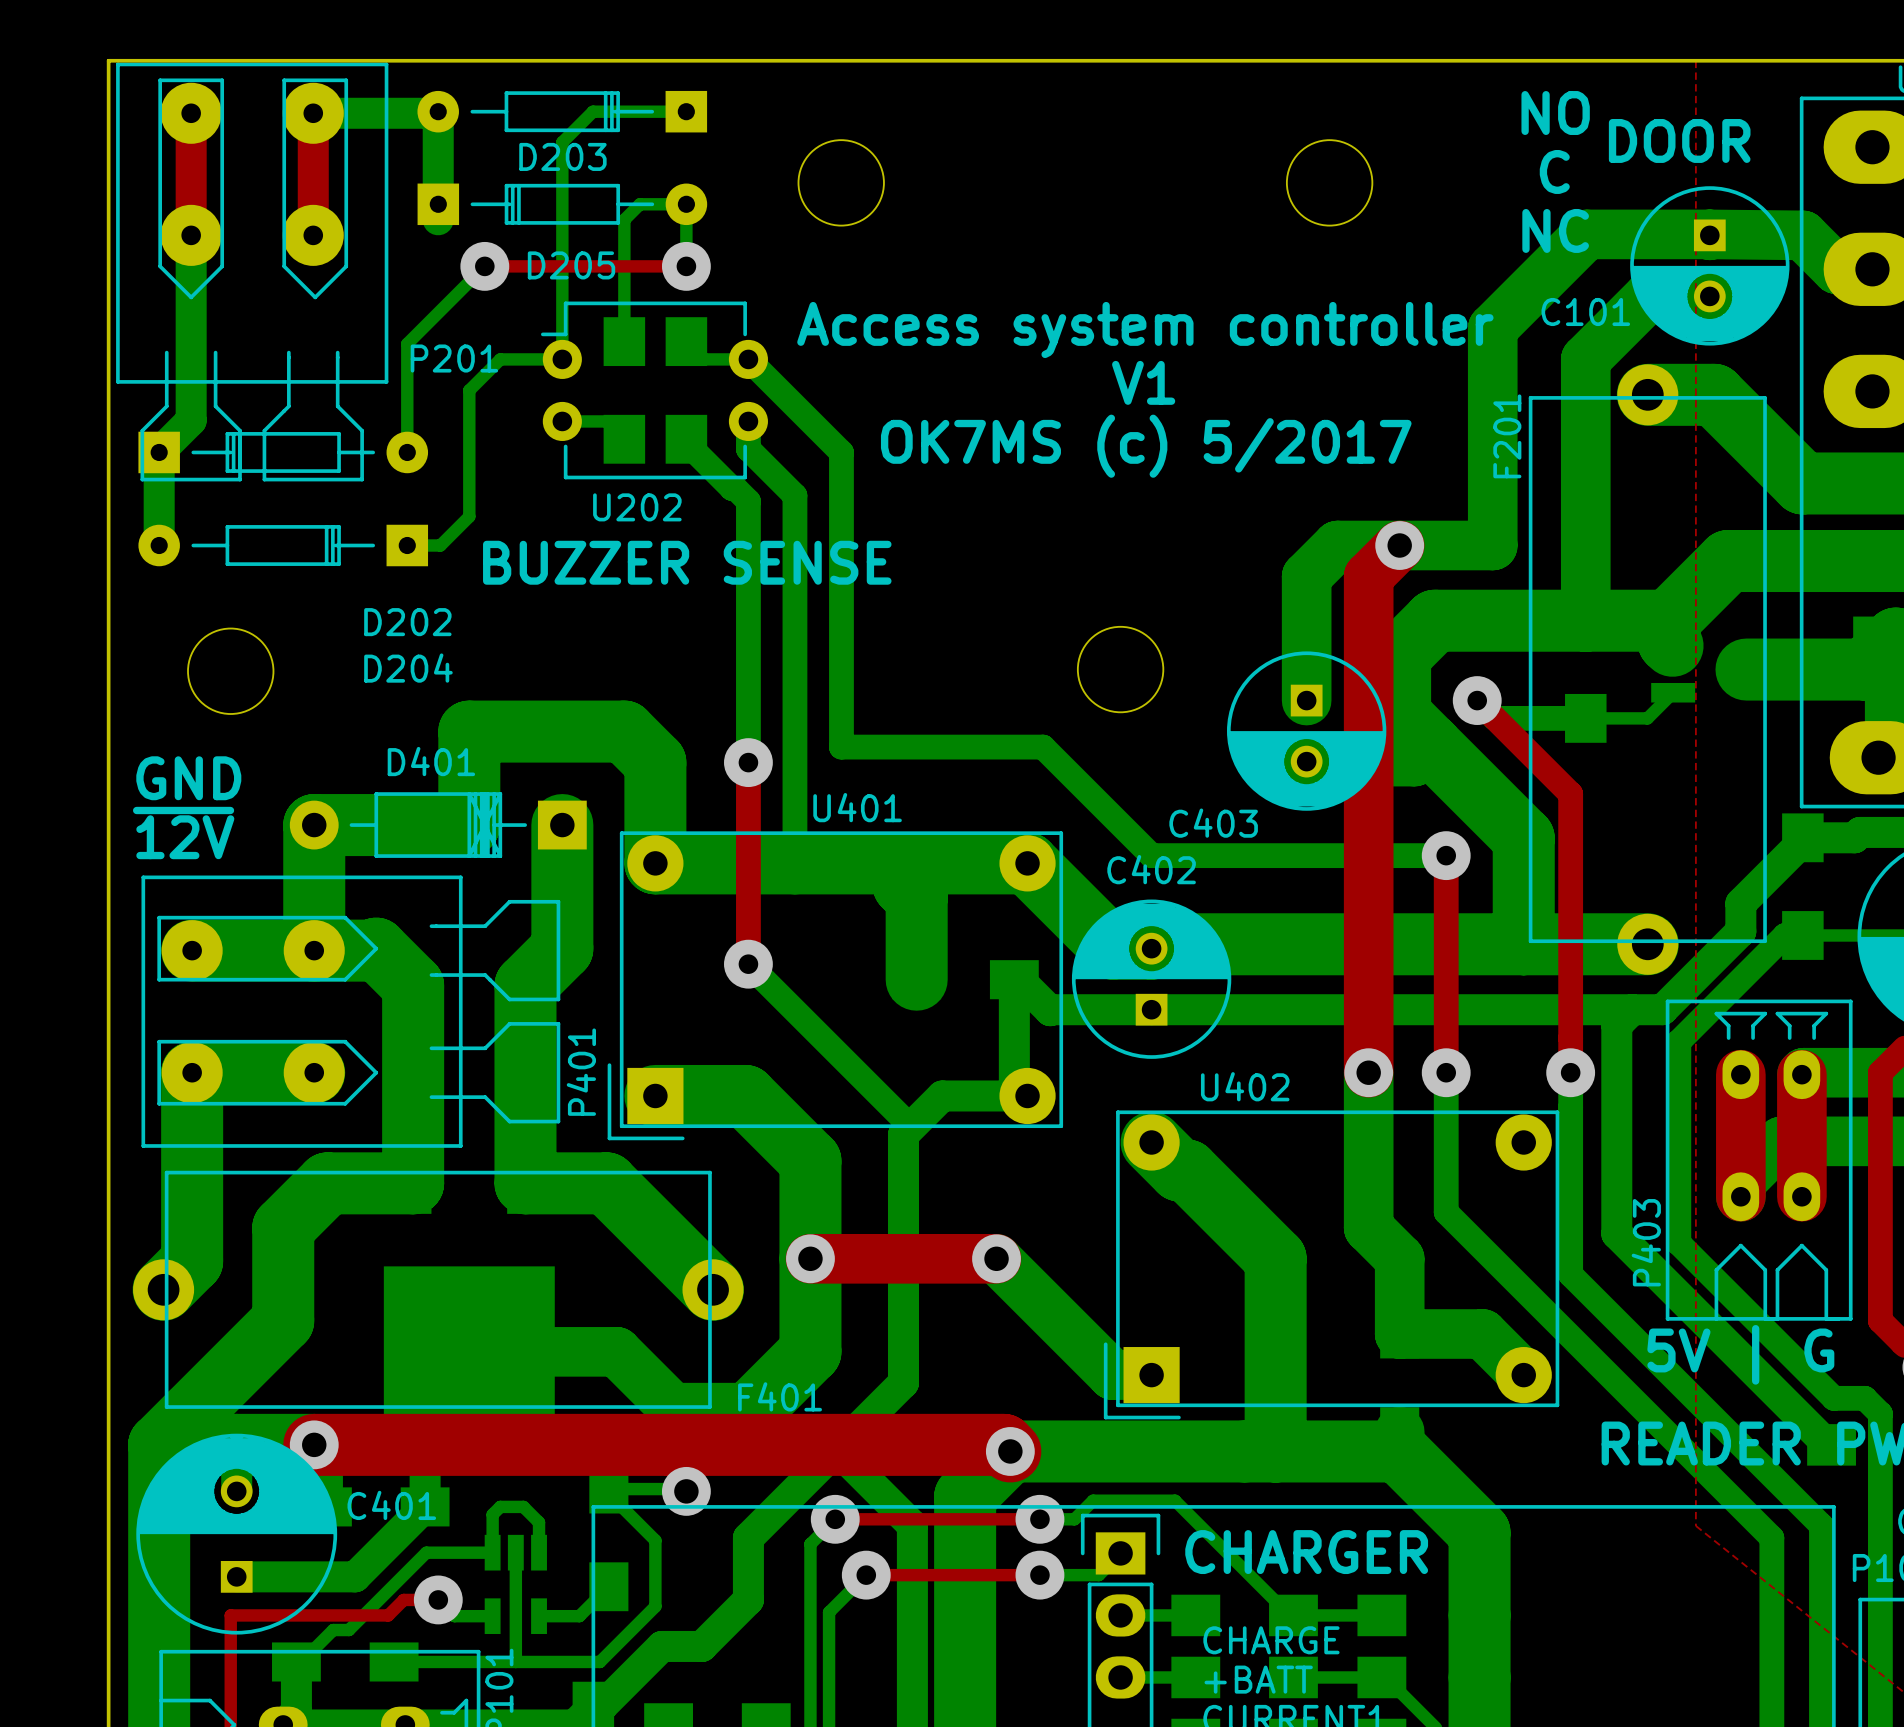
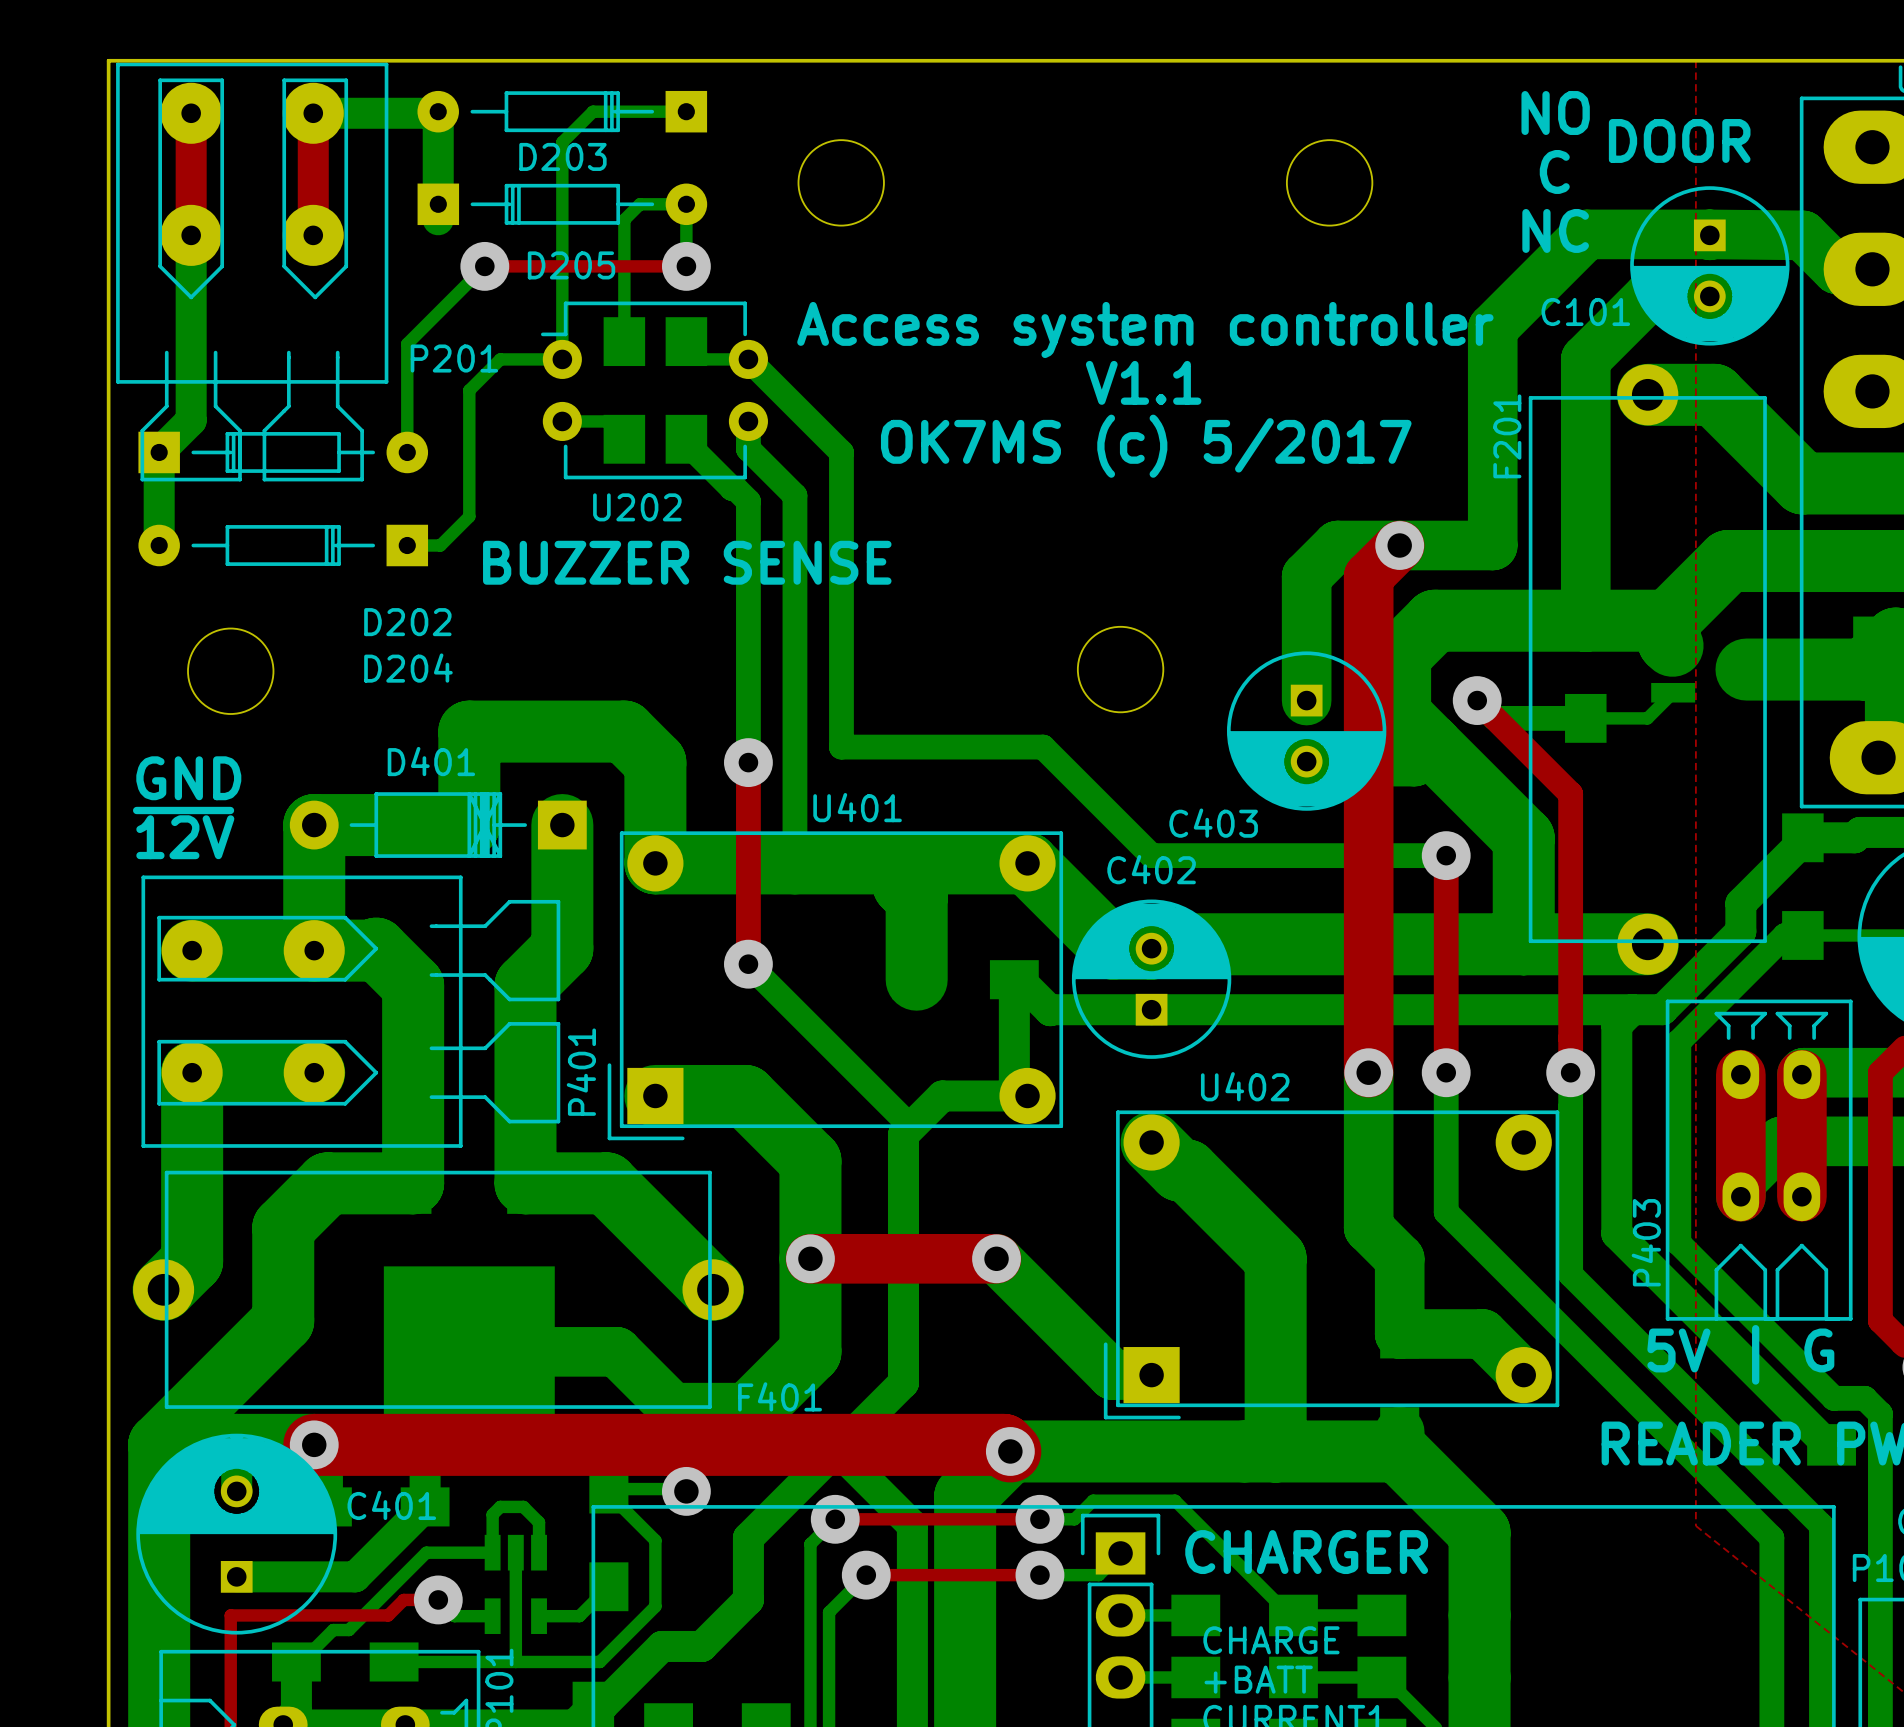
text: V1 (1143, 382) -> V1.1 (1143, 382)

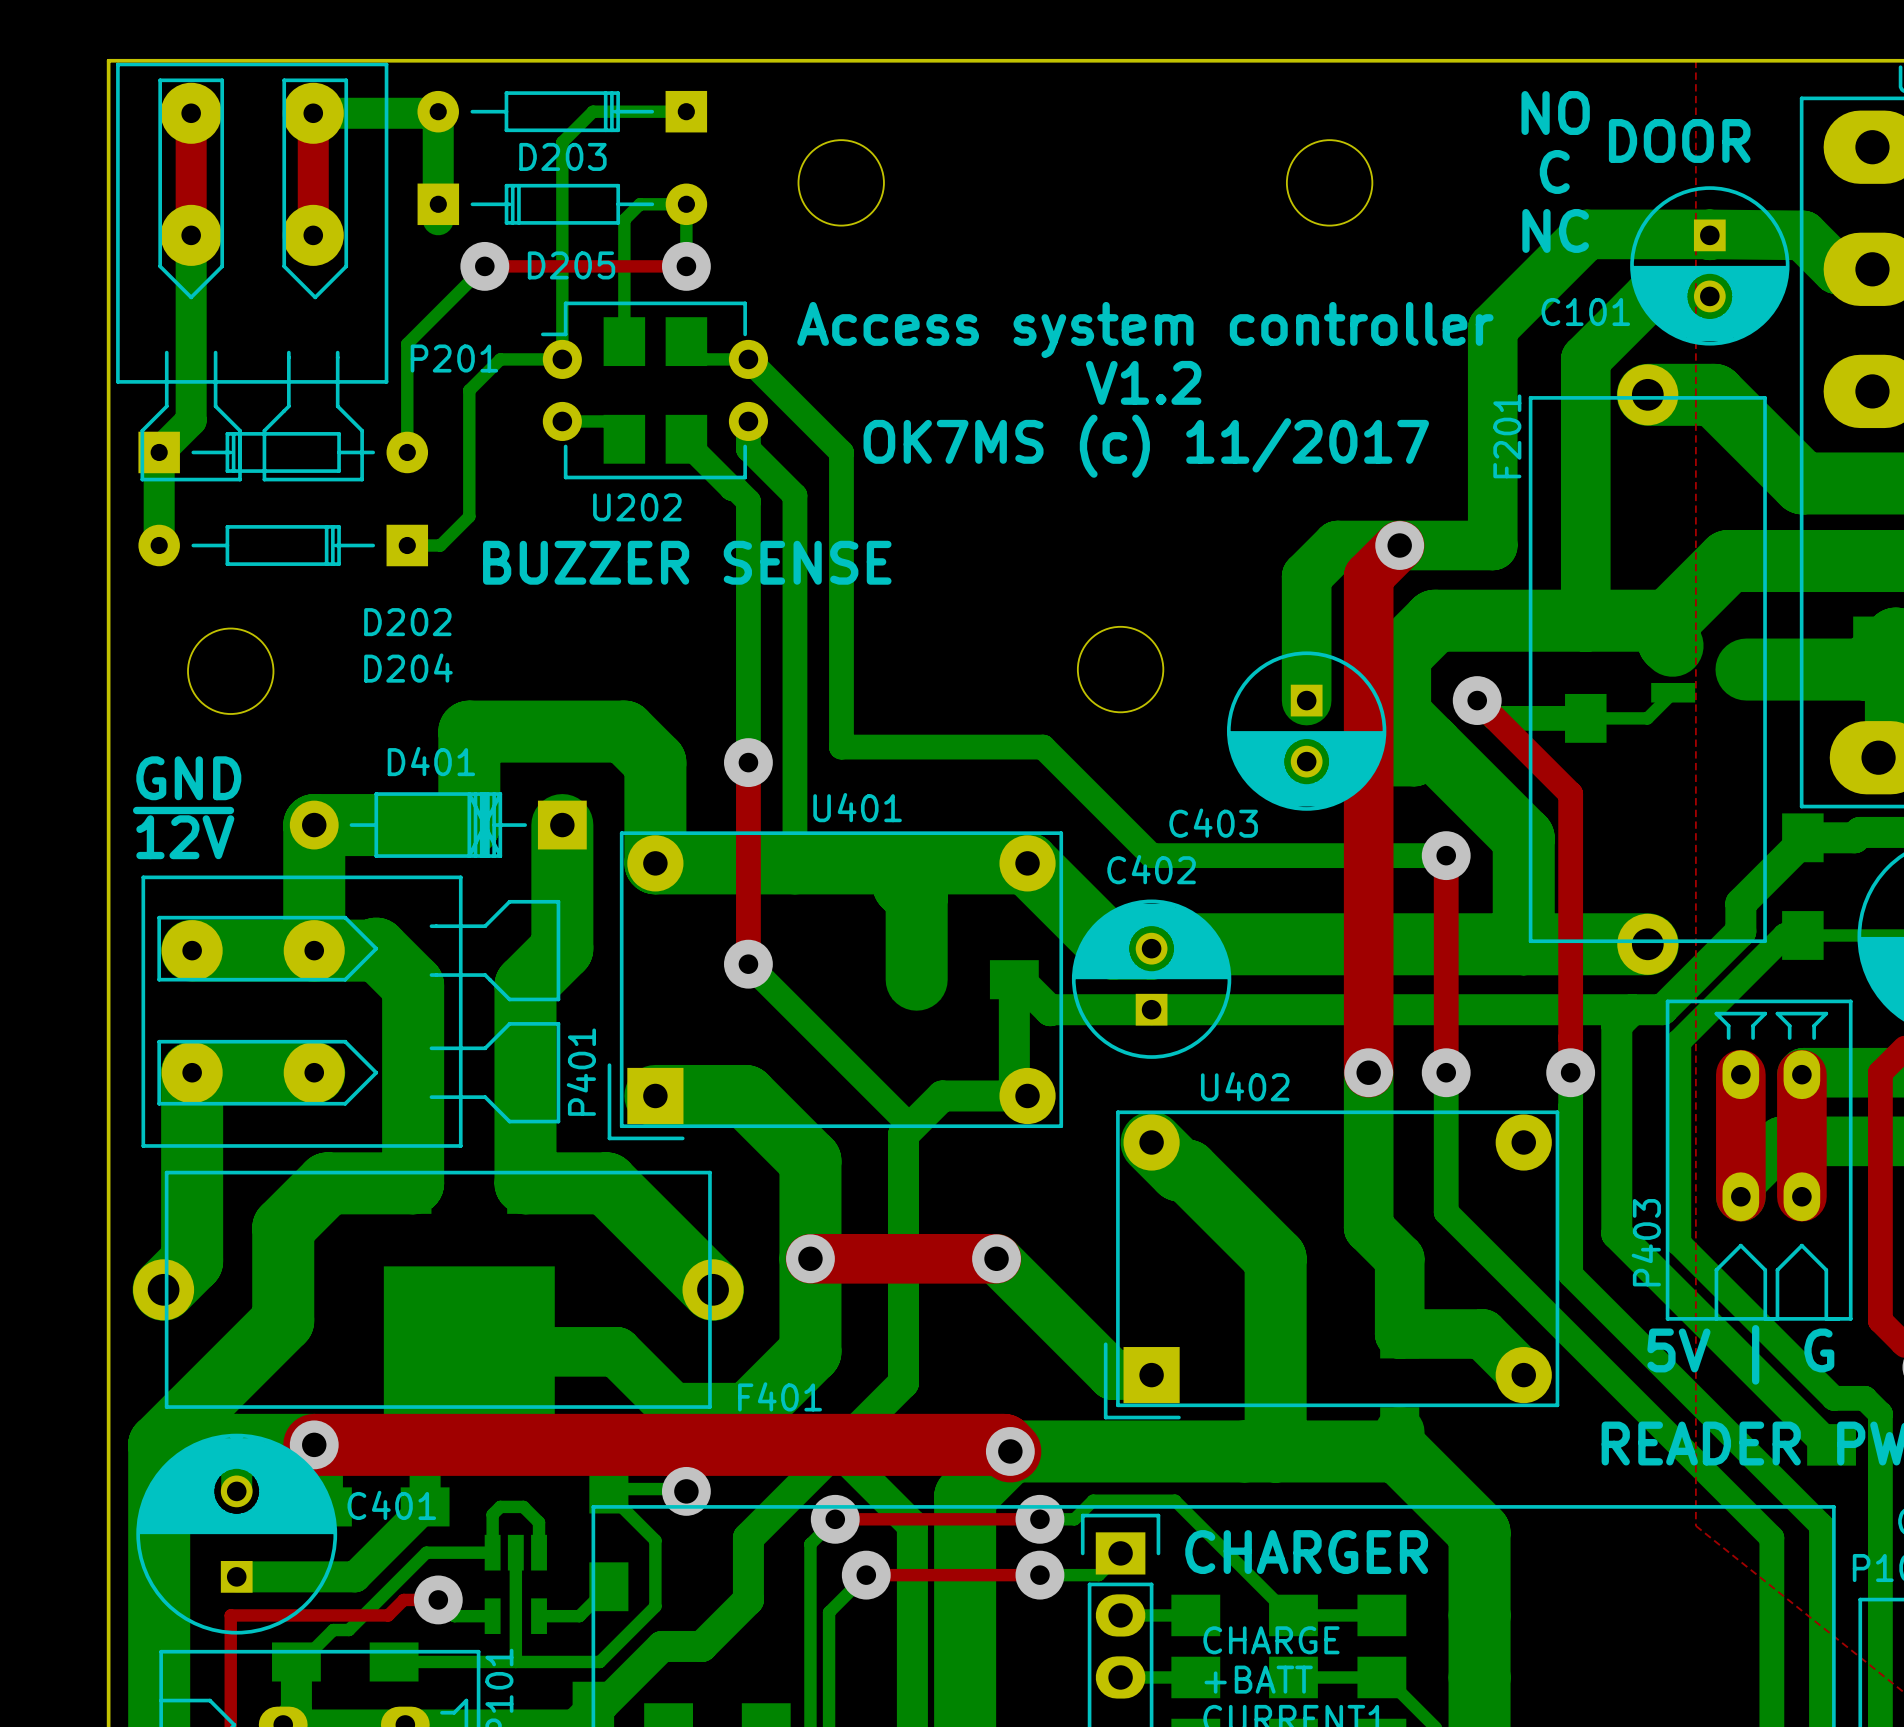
text: V1.1 (1143, 382) -> V1.2 (1143, 382)
text: OK7MS (c) 5/2017 (1146, 446) -> OK7MS (c) 11/2017 (1146, 446)

